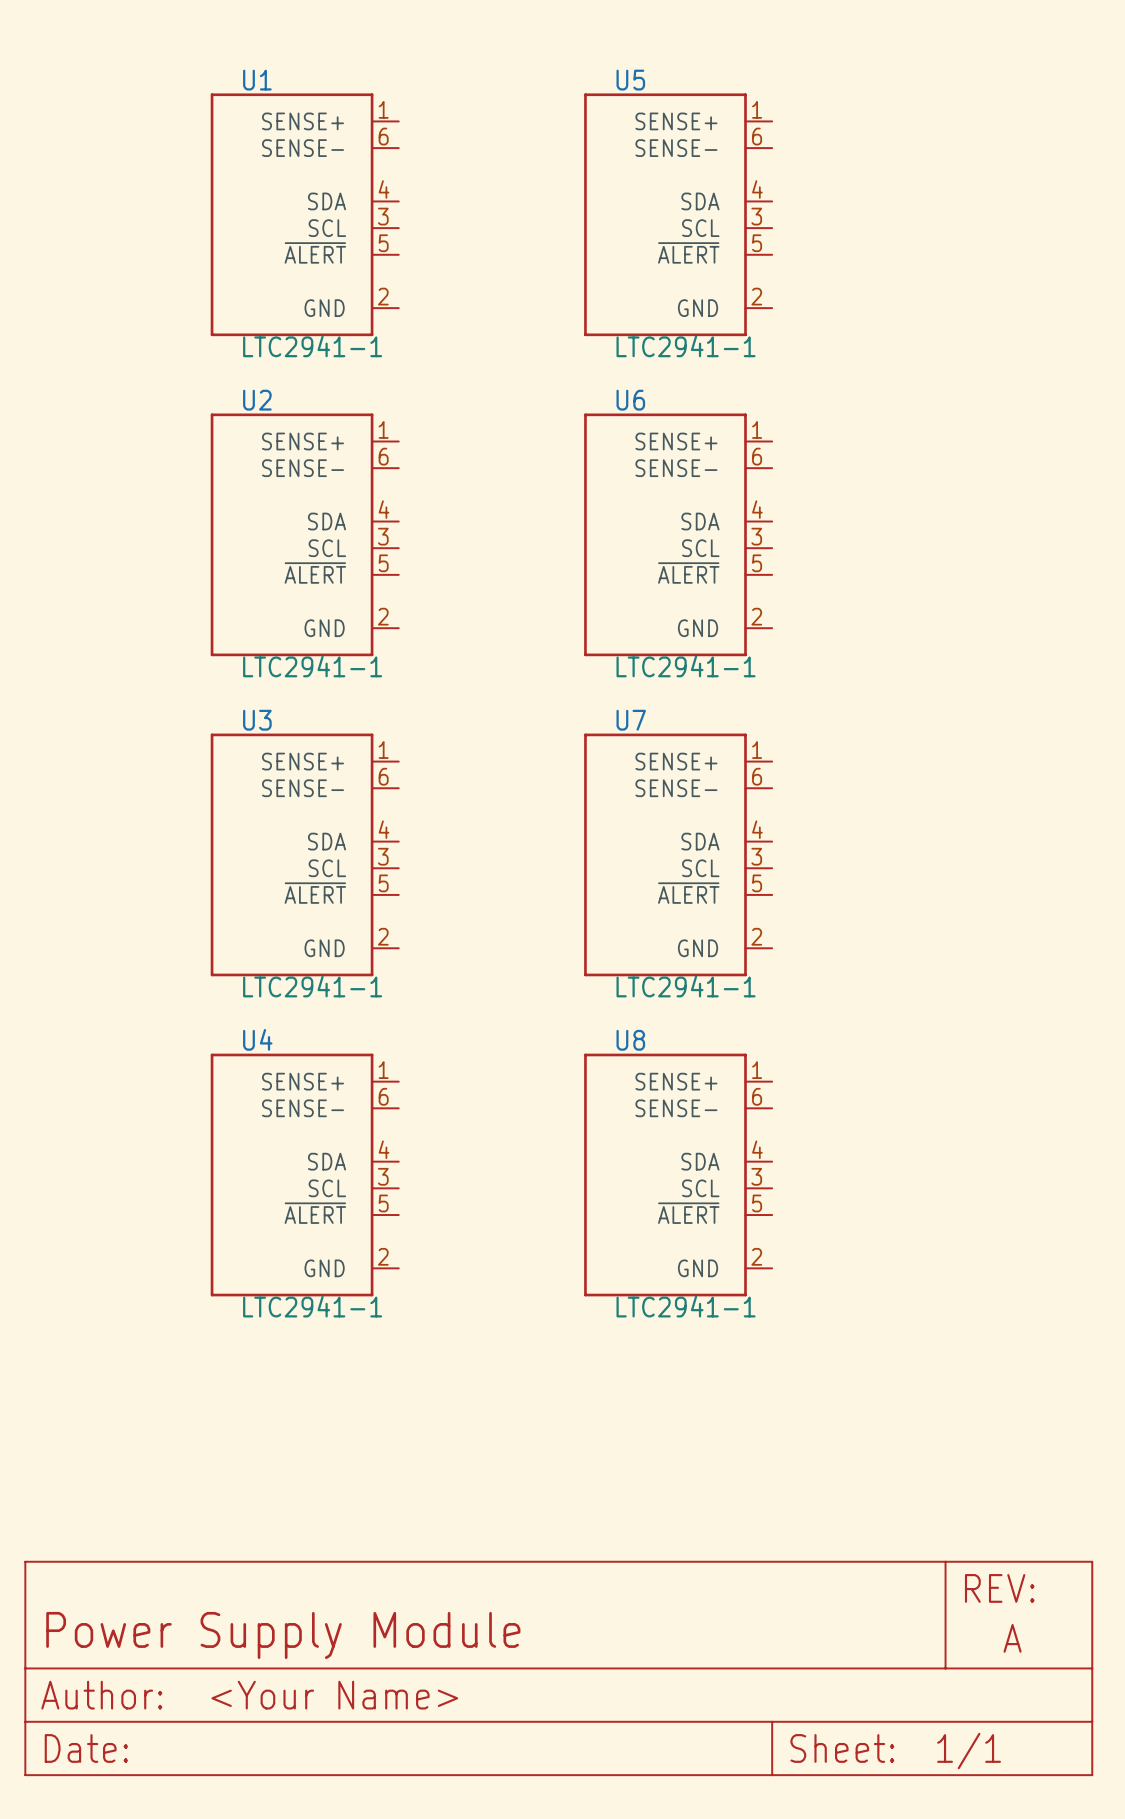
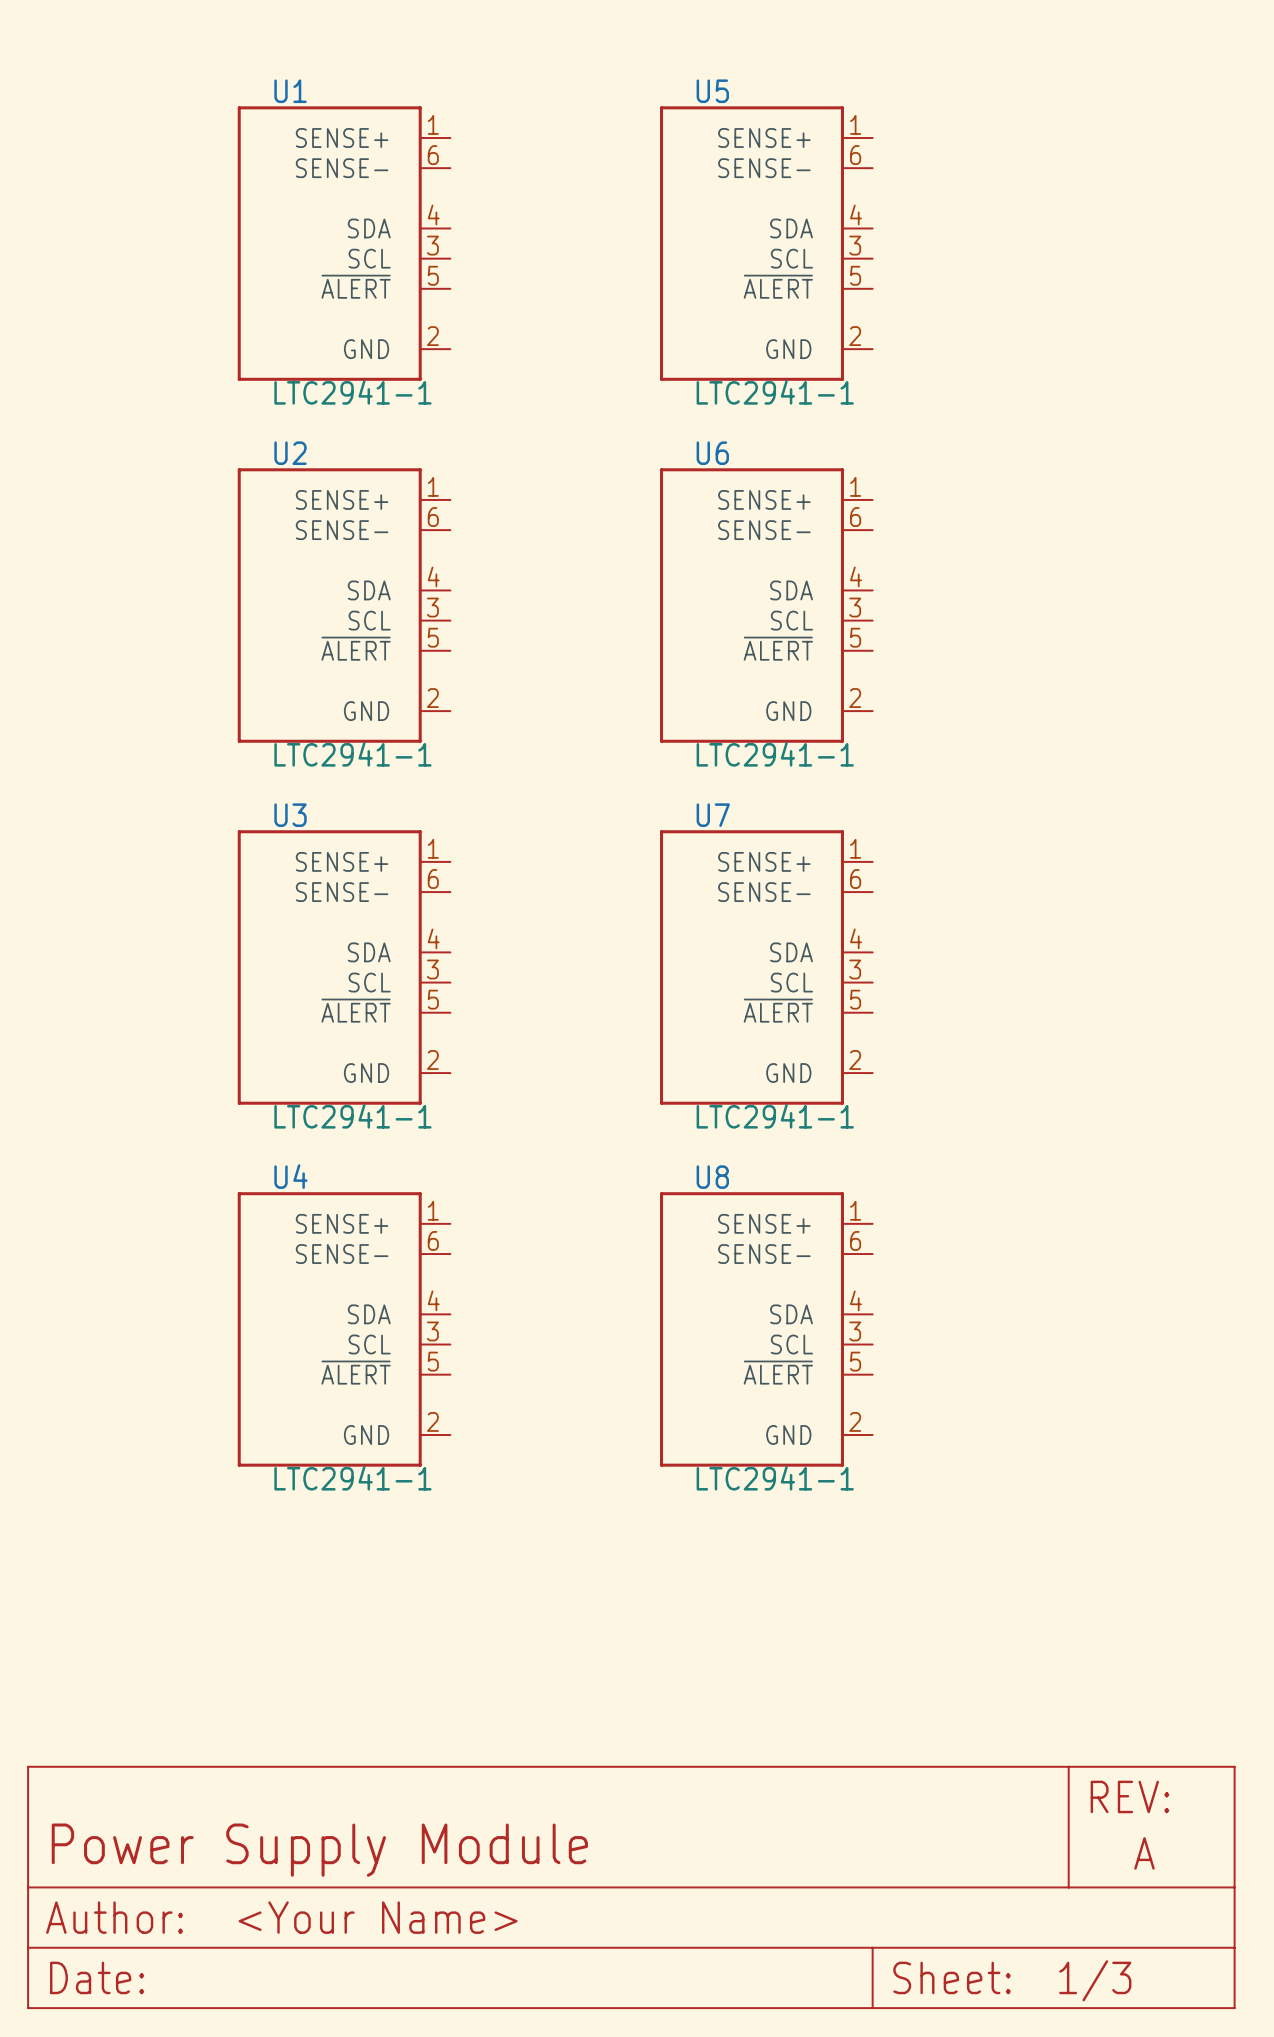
part text: 1/1 (969, 1751) -> 1/3 (1095, 1980)

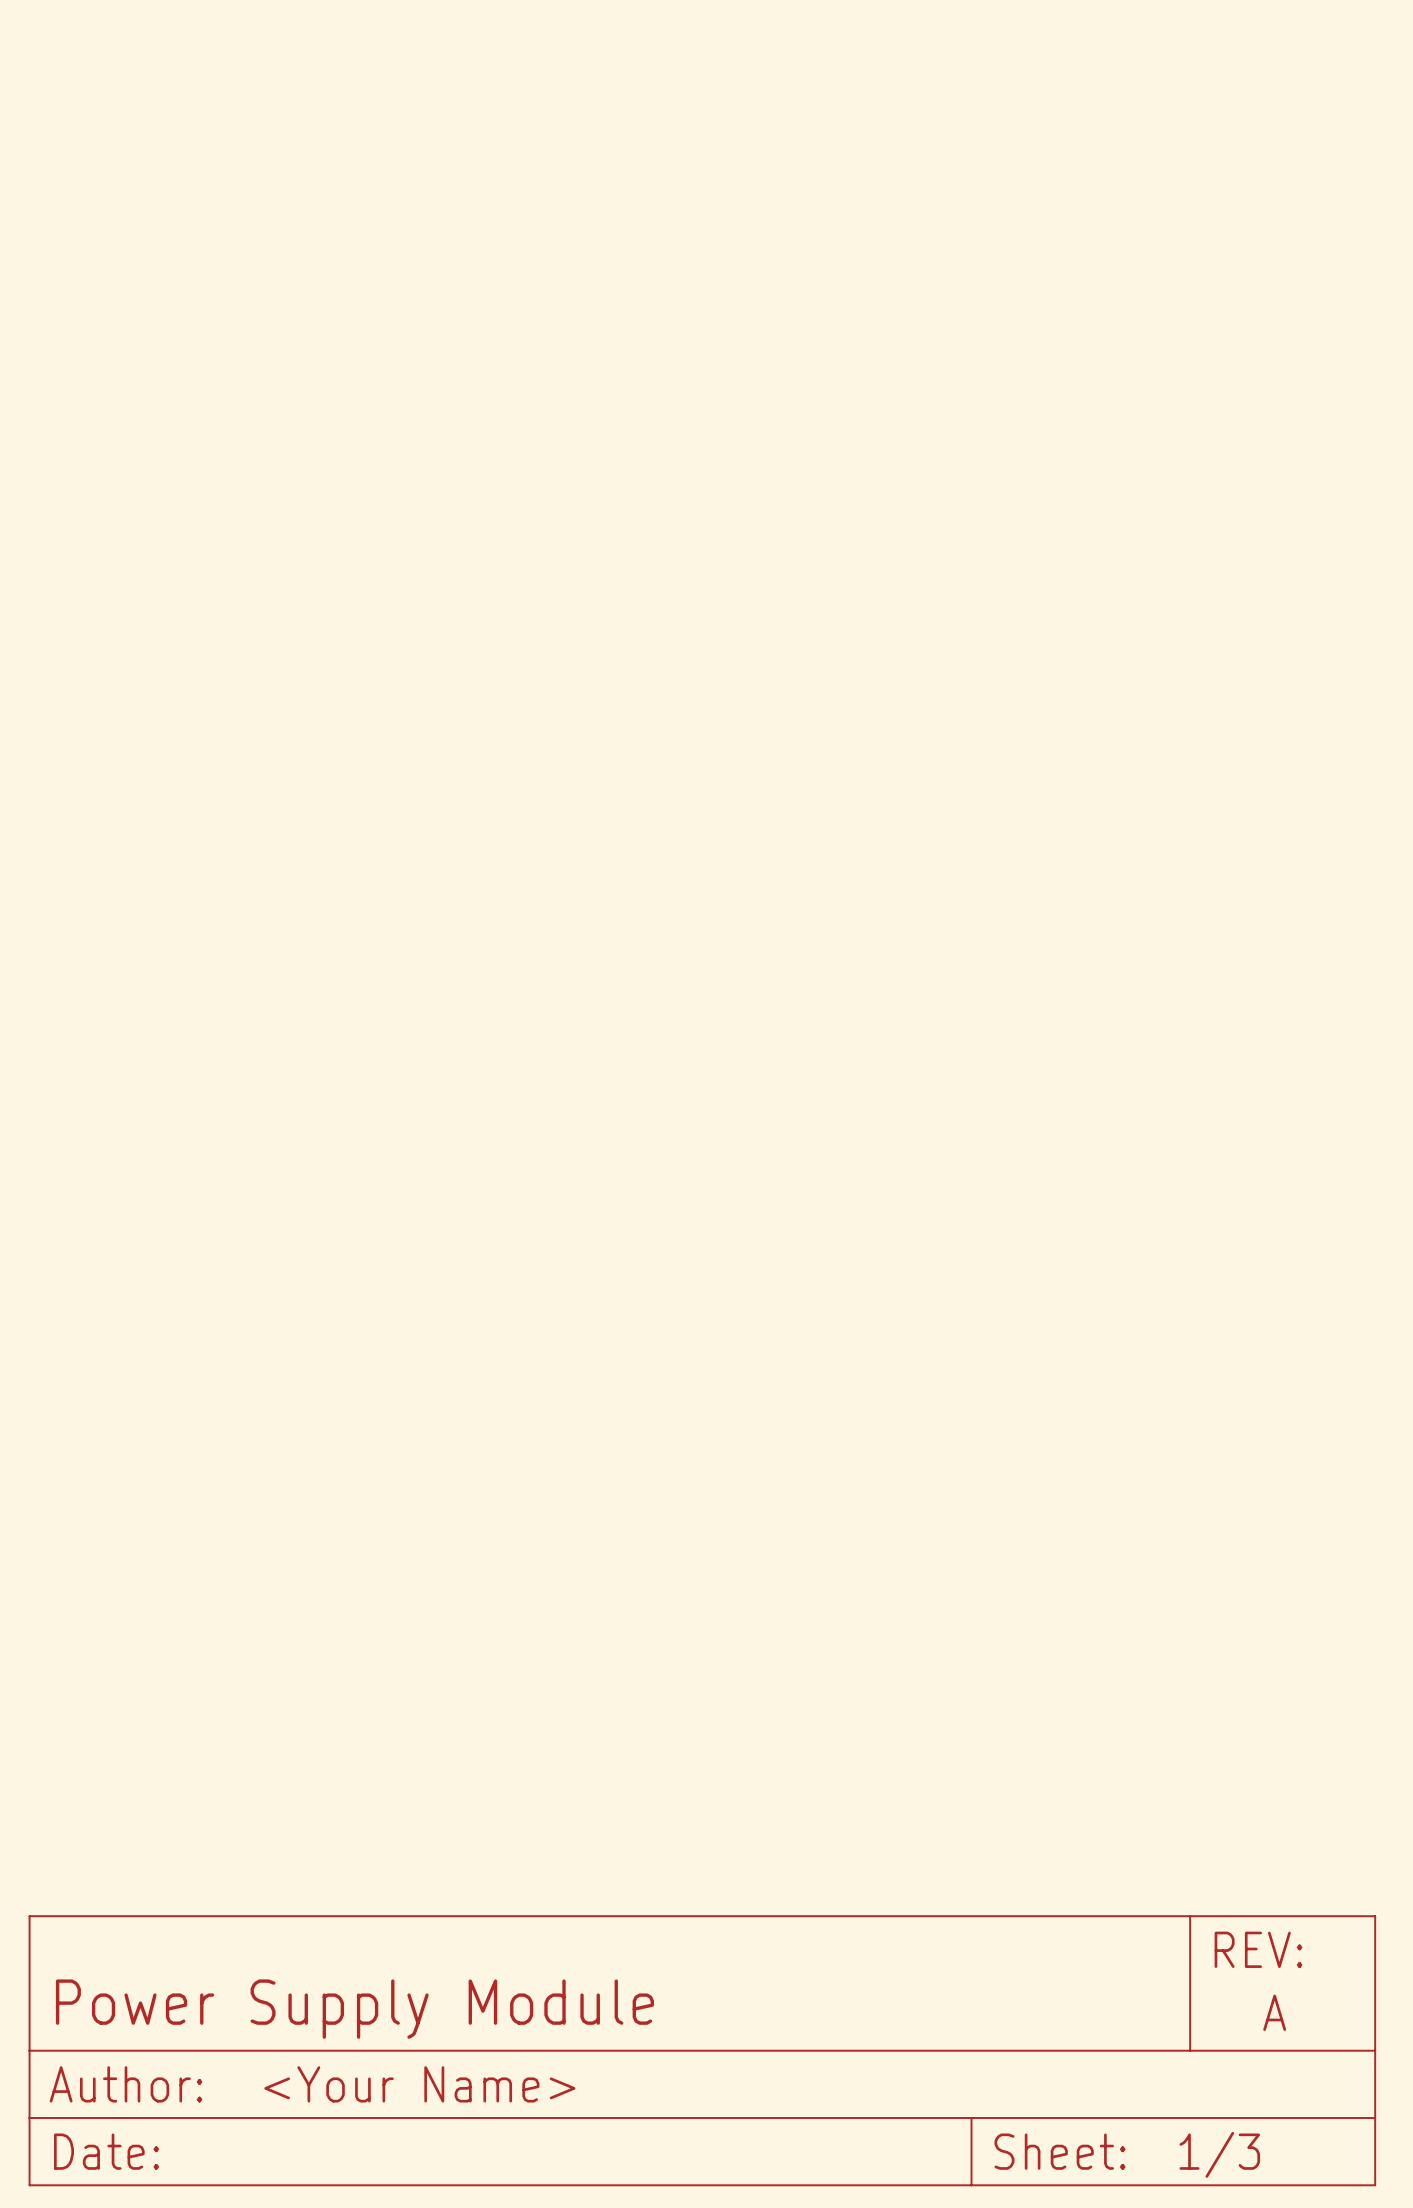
U1: LTC2941-1 (344, 243) -> none
U5: LTC2941-1 (766, 243) -> none
U2: LTC2941-1 (344, 605) -> none
U6: LTC2941-1 (766, 605) -> none
U3: LTC2941-1 (344, 967) -> none
U7: LTC2941-1 (766, 967) -> none
U4: LTC2941-1 (344, 1329) -> none
U8: LTC2941-1 (766, 1329) -> none

